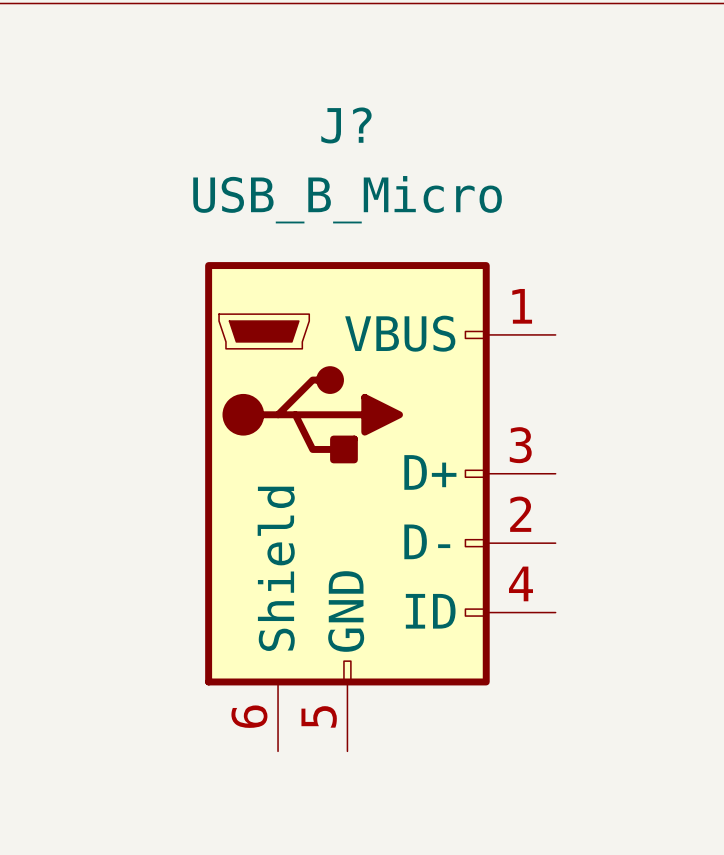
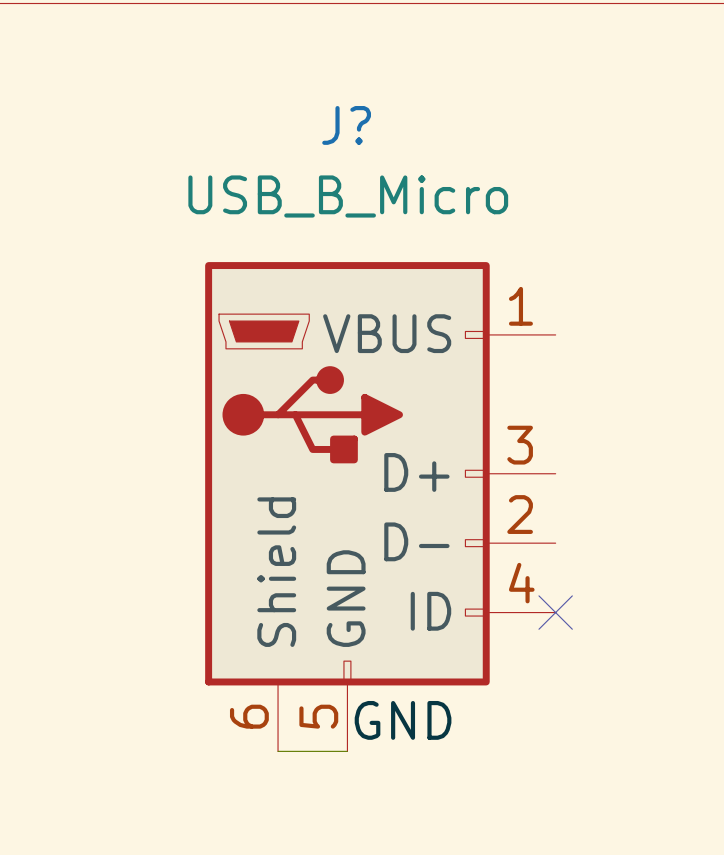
no-connect mark: none -> (555, 612)
label: none -> GND (403, 720)
wire: none -> (278, 751) (347, 751)

